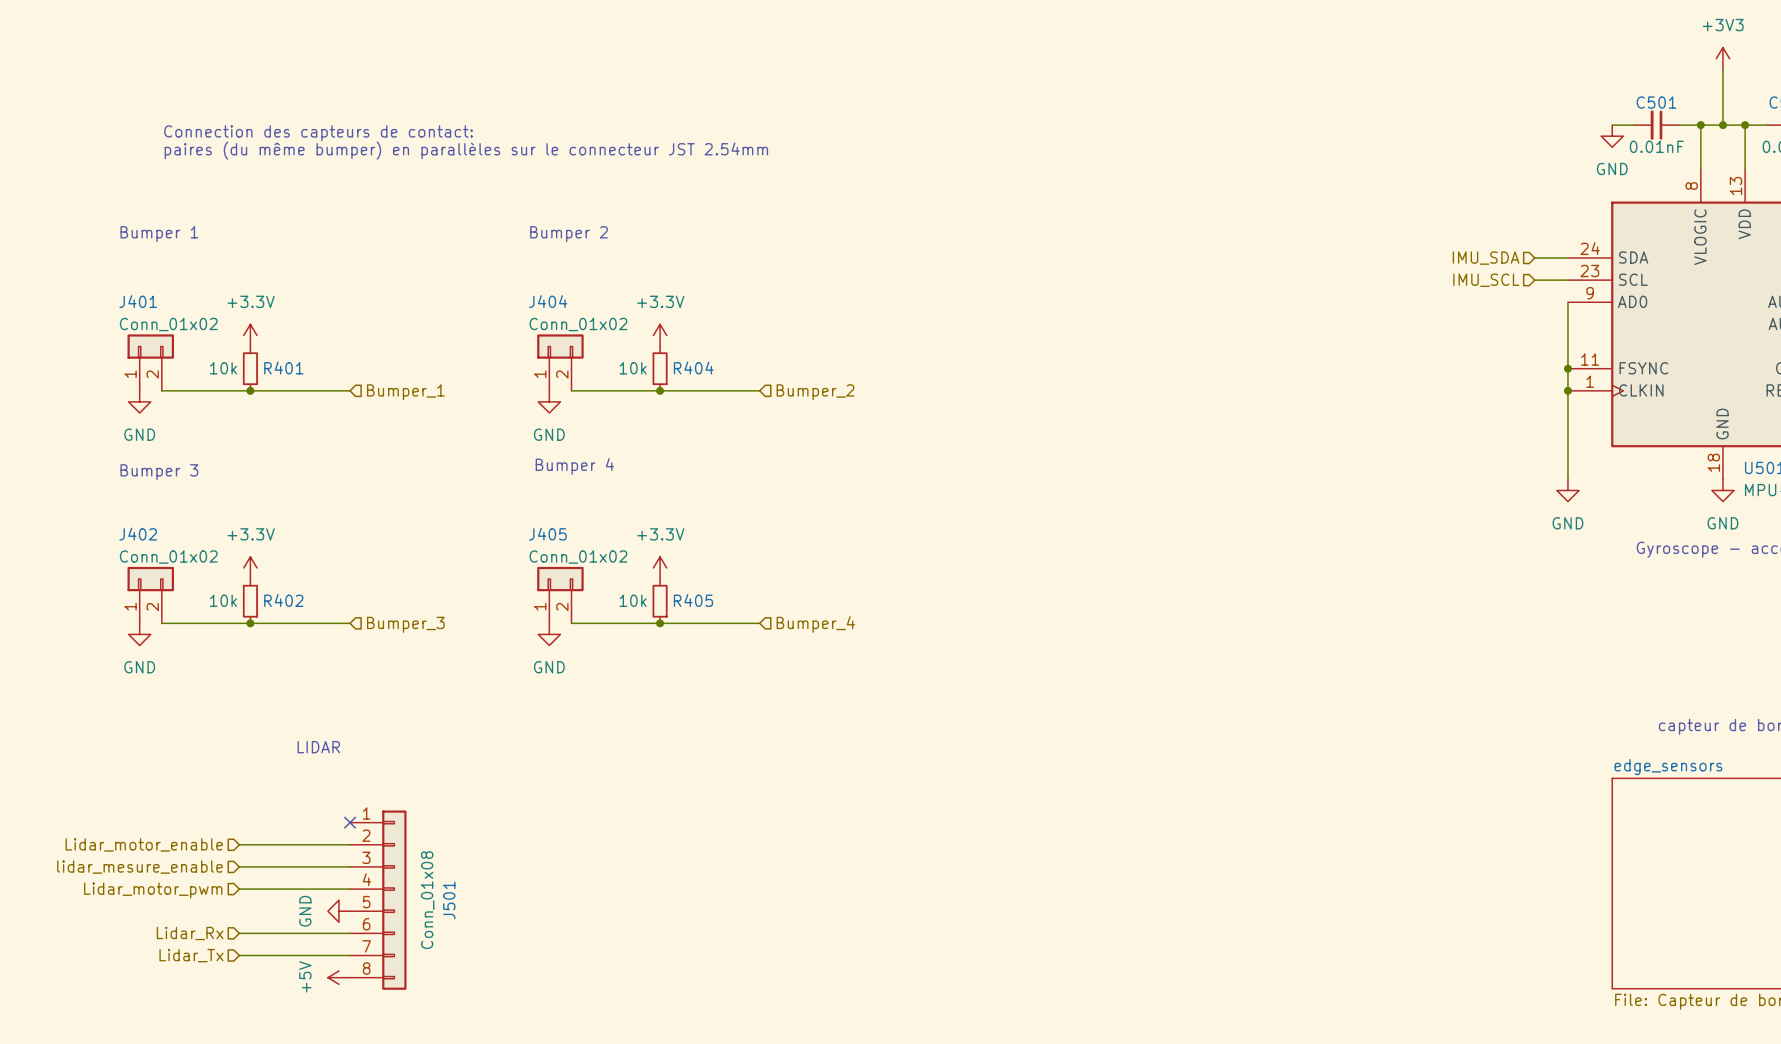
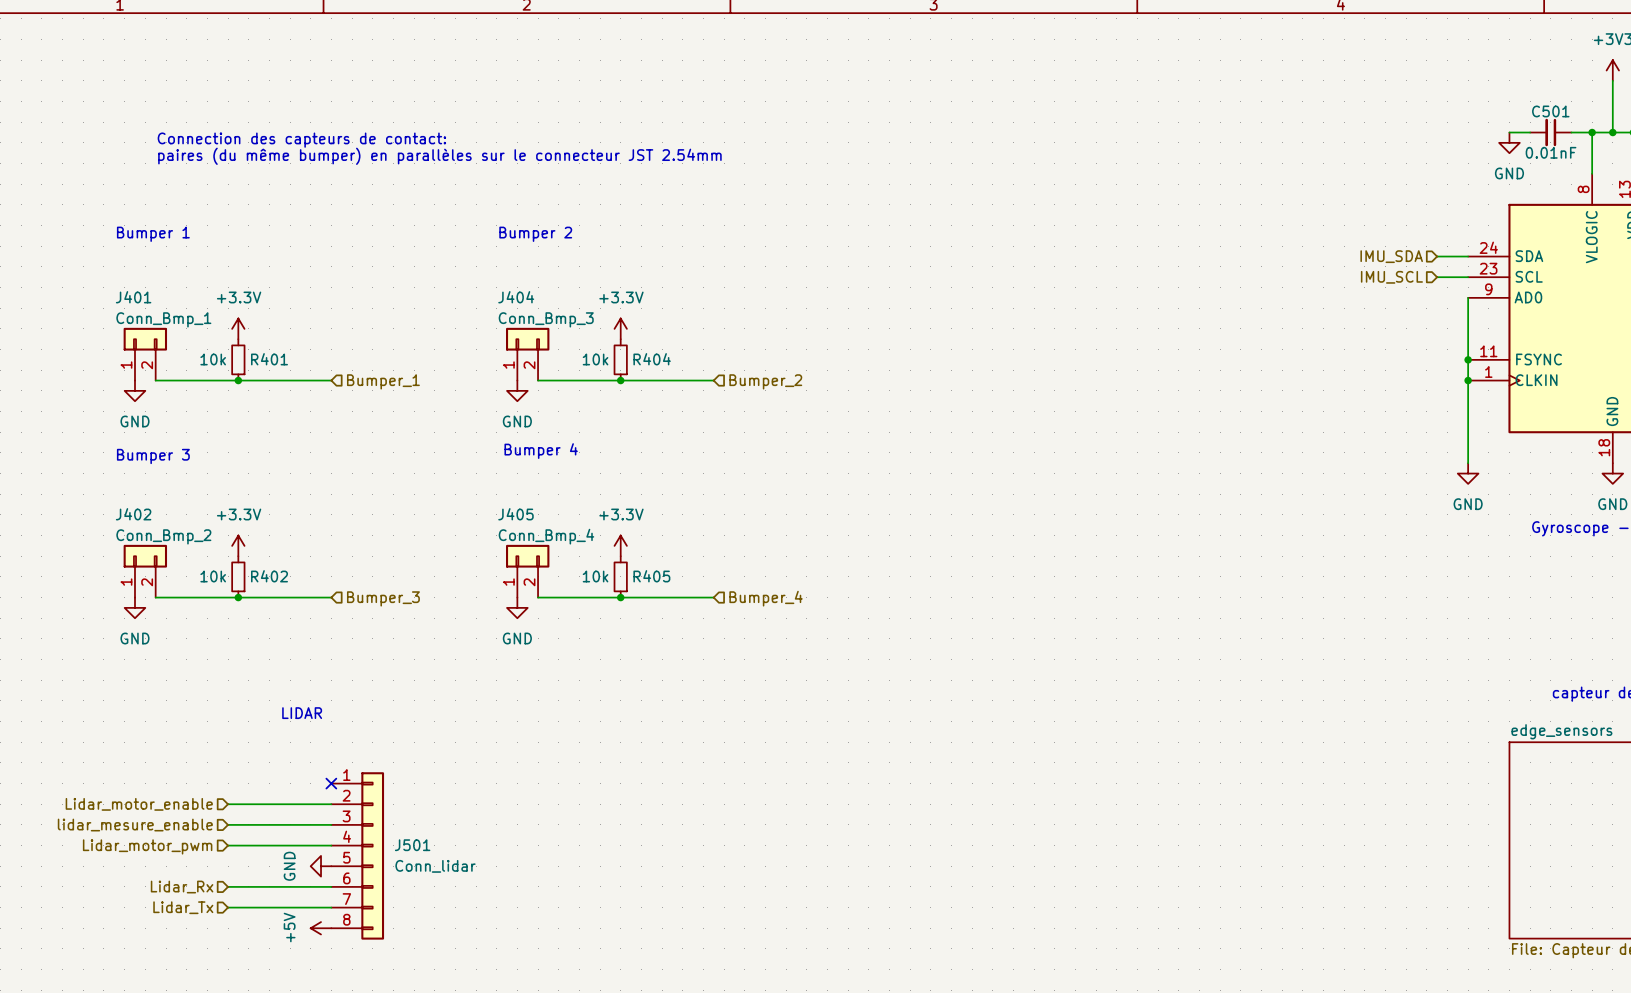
J401 value: Conn_01x02 (168, 324) -> Conn_Bmp_1 (163, 319)
J404 value: Conn_01x02 (578, 324) -> Conn_Bmp_3 (546, 319)
J402 value: Conn_01x02 (168, 557) -> Conn_Bmp_2 (163, 536)
J405 value: Conn_01x02 (578, 557) -> Conn_Bmp_4 (546, 536)
J501 value: Conn_01x08 (427, 900) -> Conn_lidar (435, 866)
J501 name rotation: 0° (449, 900) -> 90° clockwise (412, 845)

